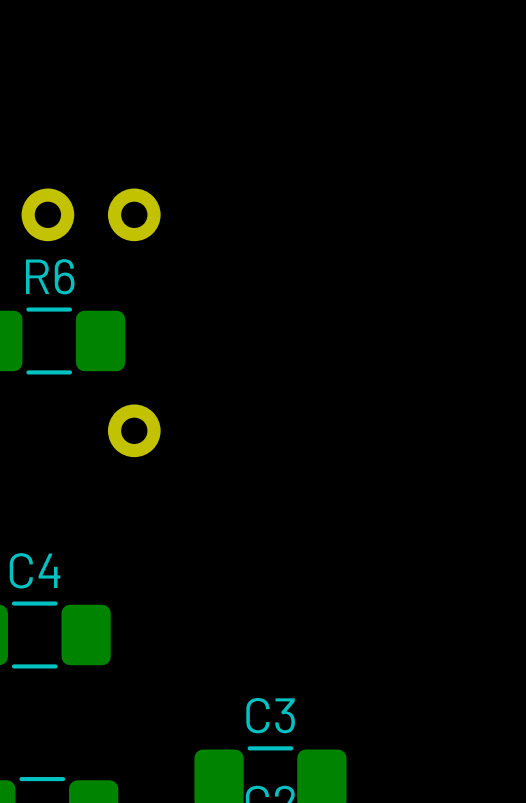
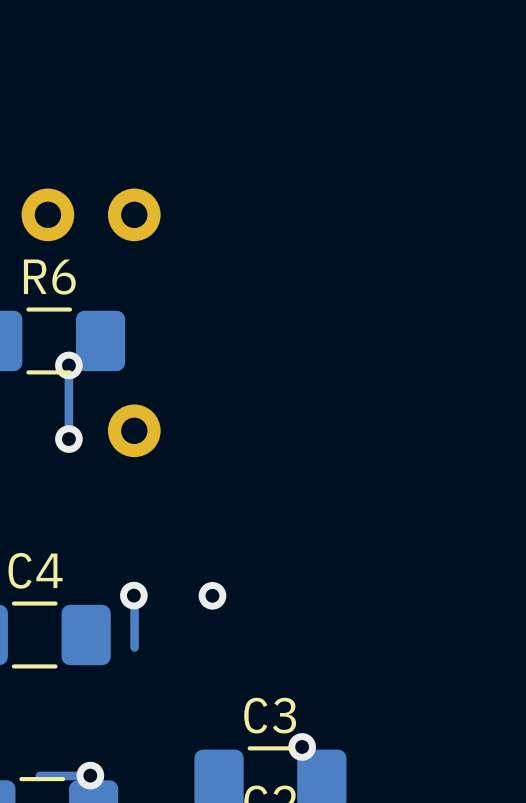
track: none -> (68, 365) (68, 439)
via: none -> (68, 365)
via: none -> (68, 439)
track: none -> (133, 595) (134, 647)
via: none -> (133, 595)
via: none -> (212, 595)
via: none -> (302, 746)
track: none -> (89, 775) (39, 775)
via: none -> (90, 775)

